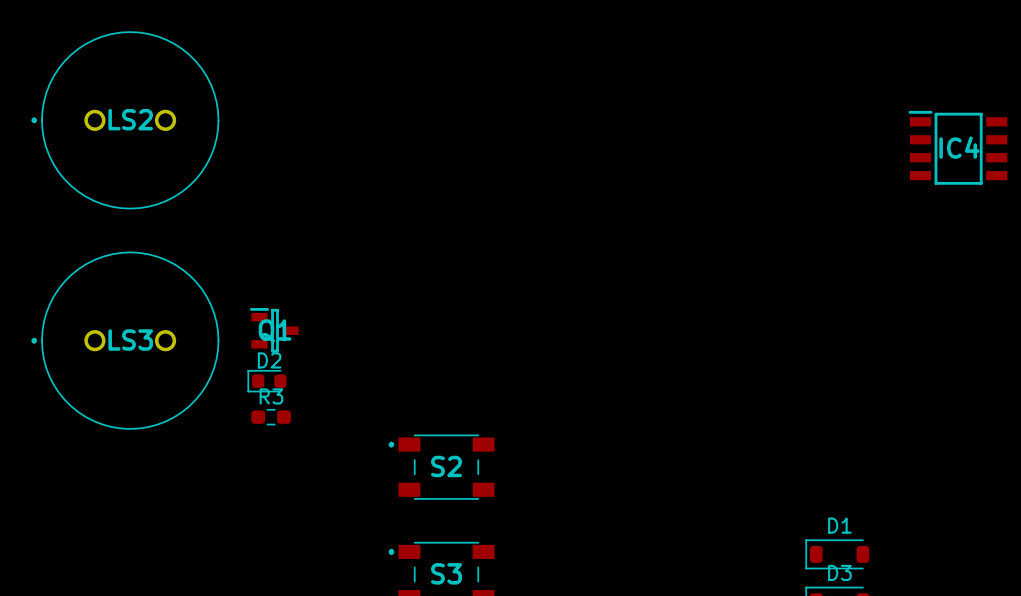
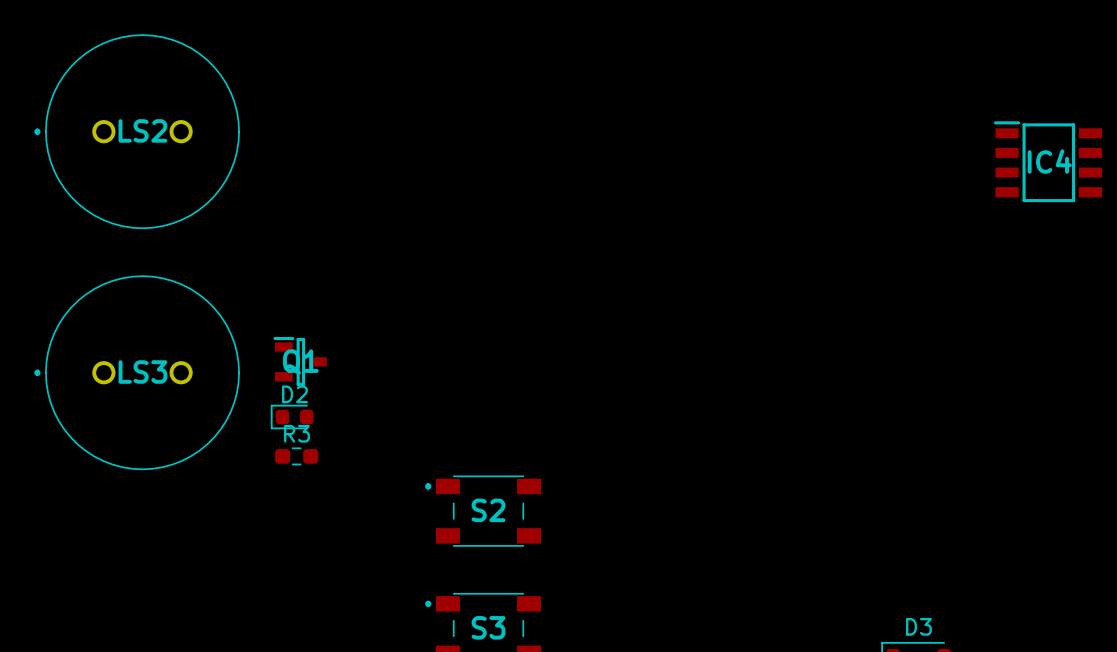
D1: (837, 554) -> none

